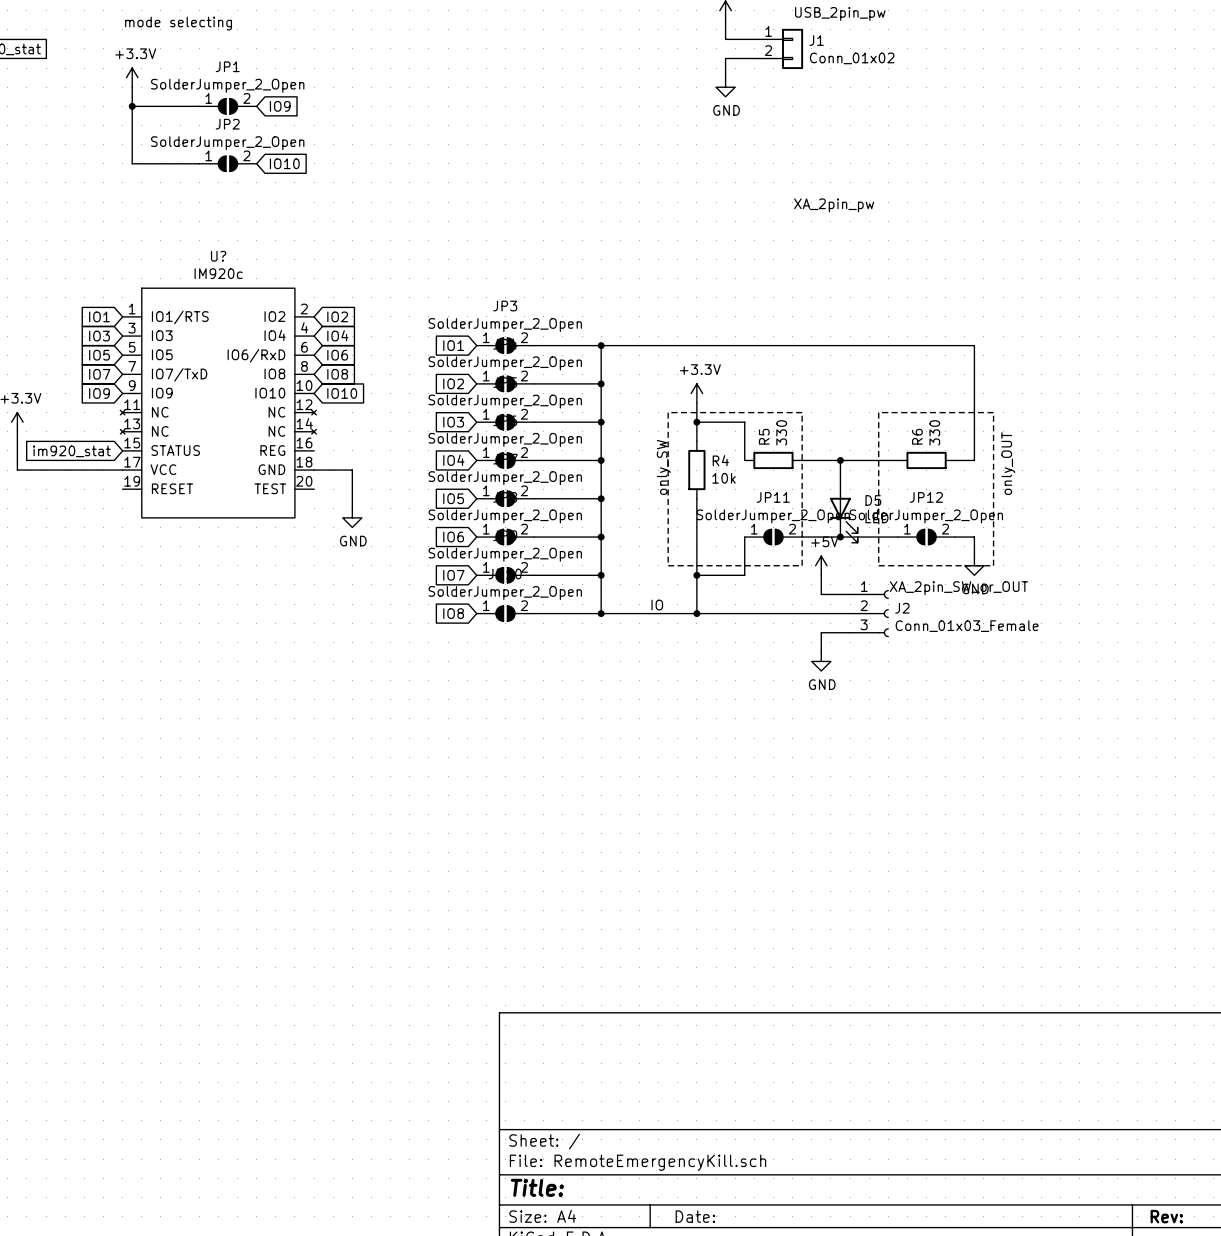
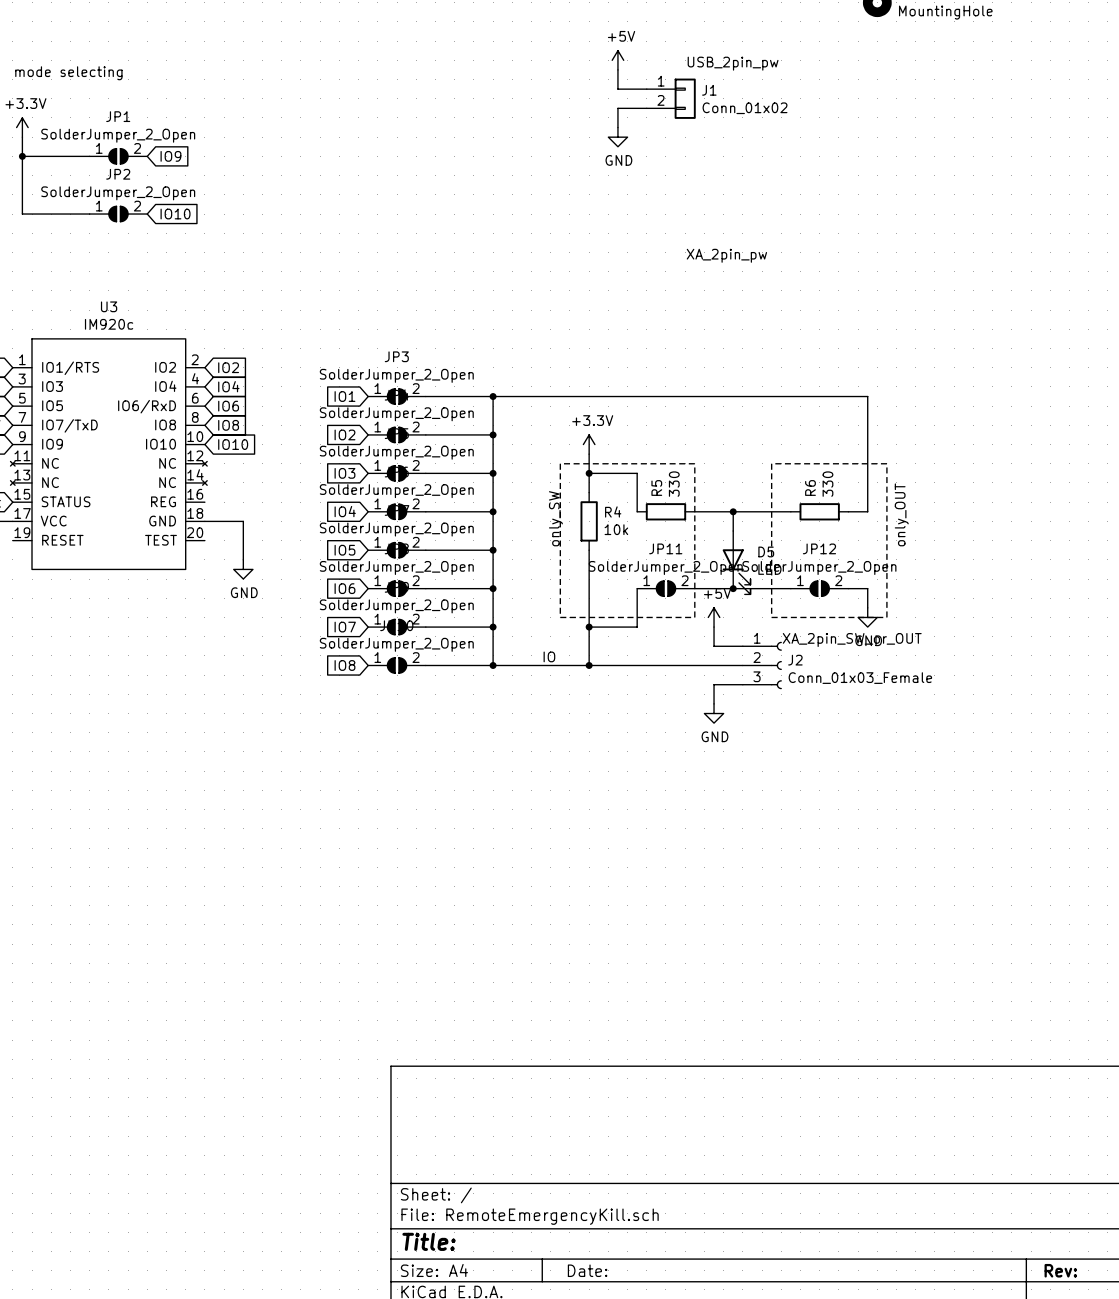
U? name: U? (218, 256) -> U3 (109, 306)

